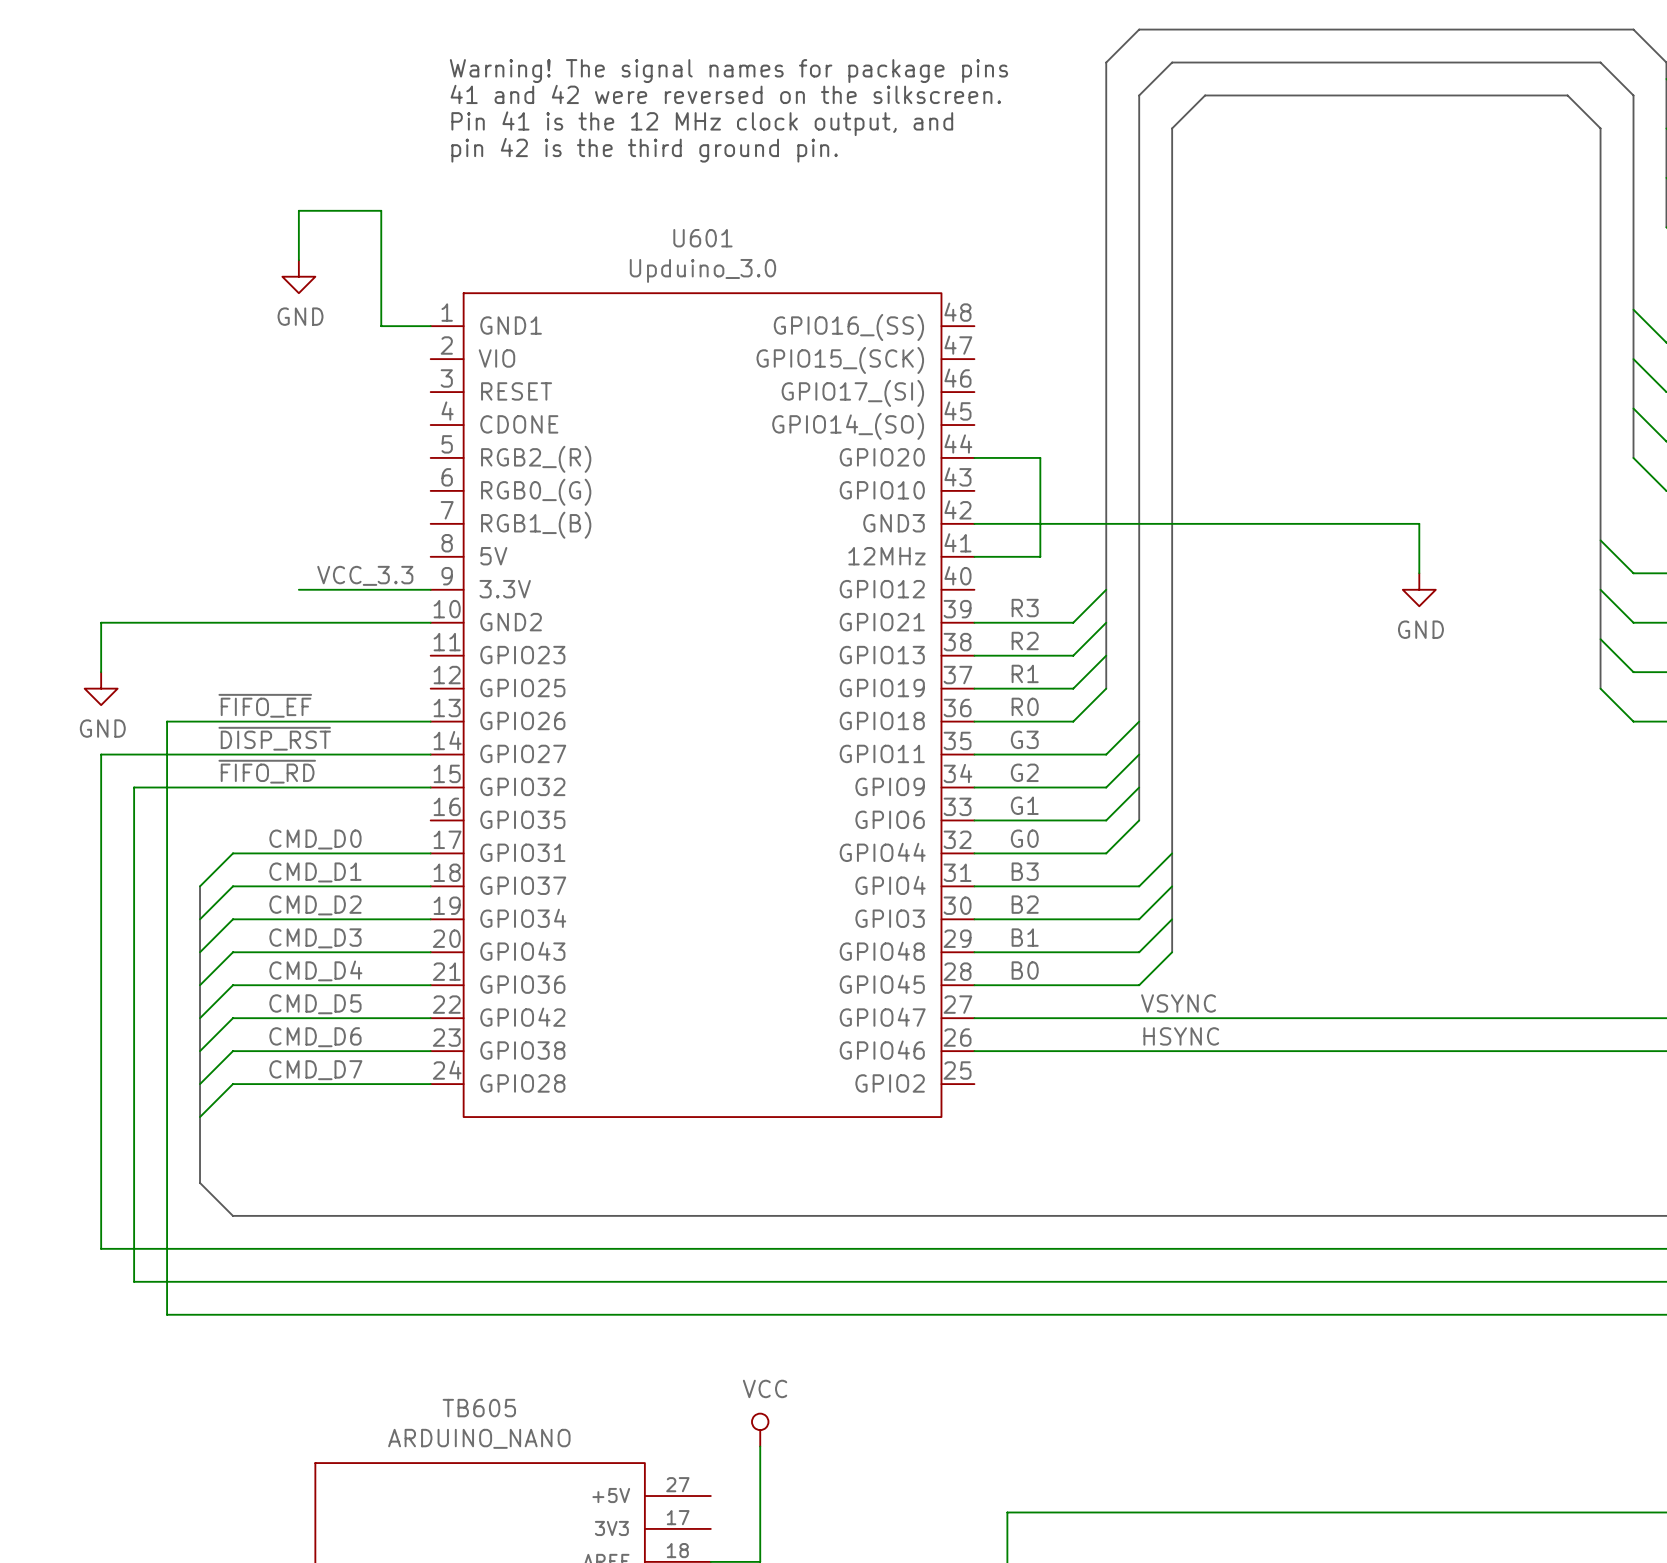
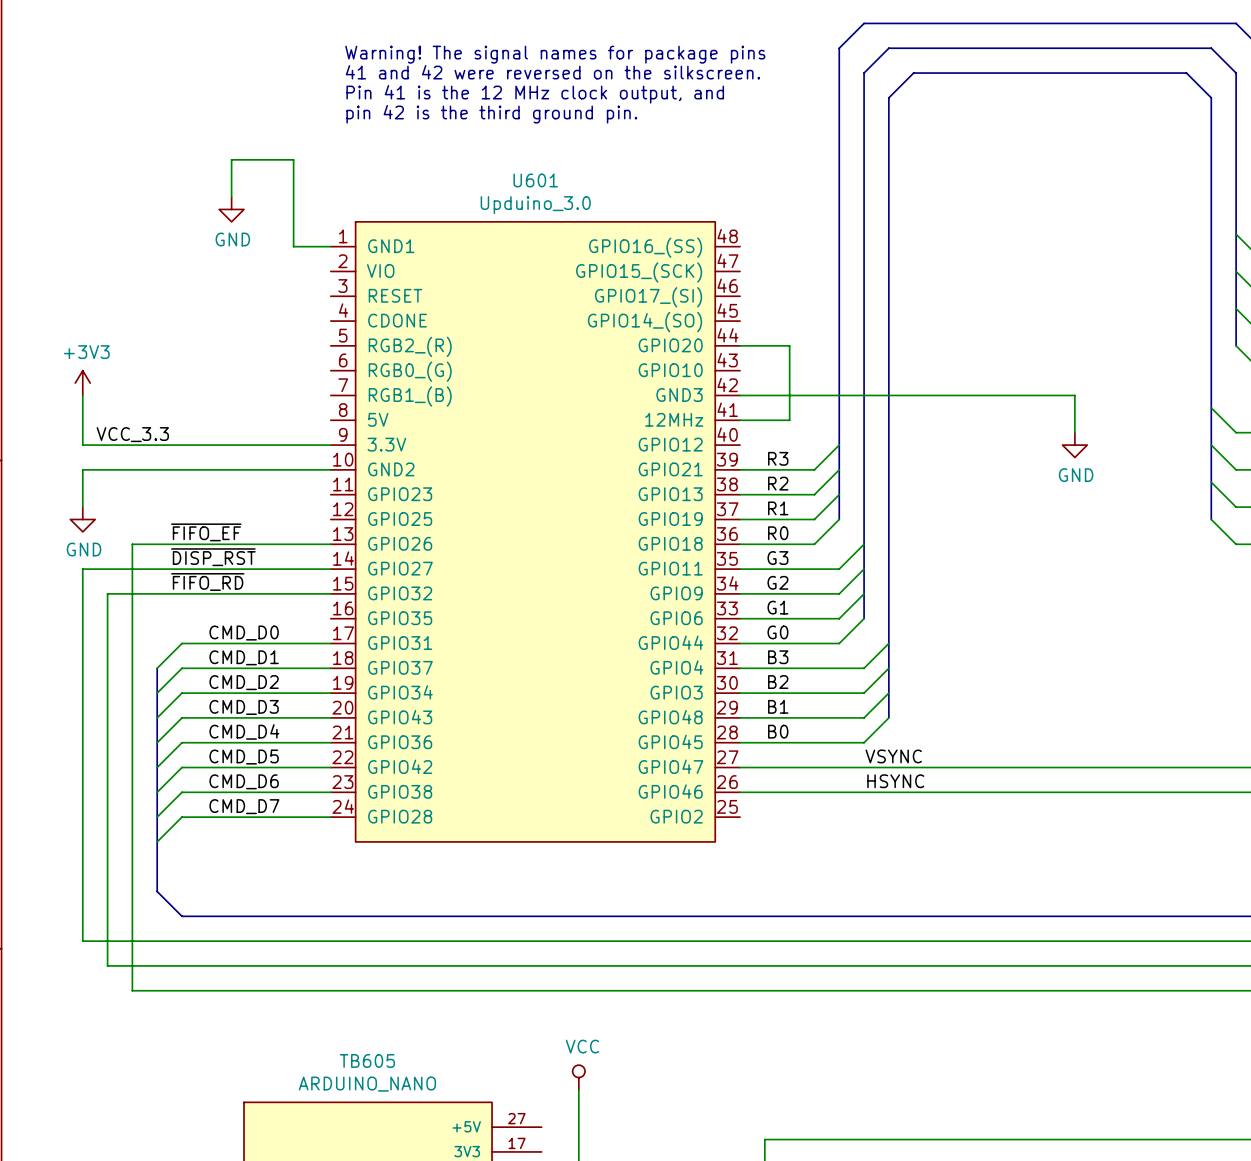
power symbol: none -> +3V3 (82, 383)
wire: none -> (82, 395) (82, 445) (231, 445)
label position: VCC_3.3 (365, 575) -> VCC_3.3 (132, 434)

